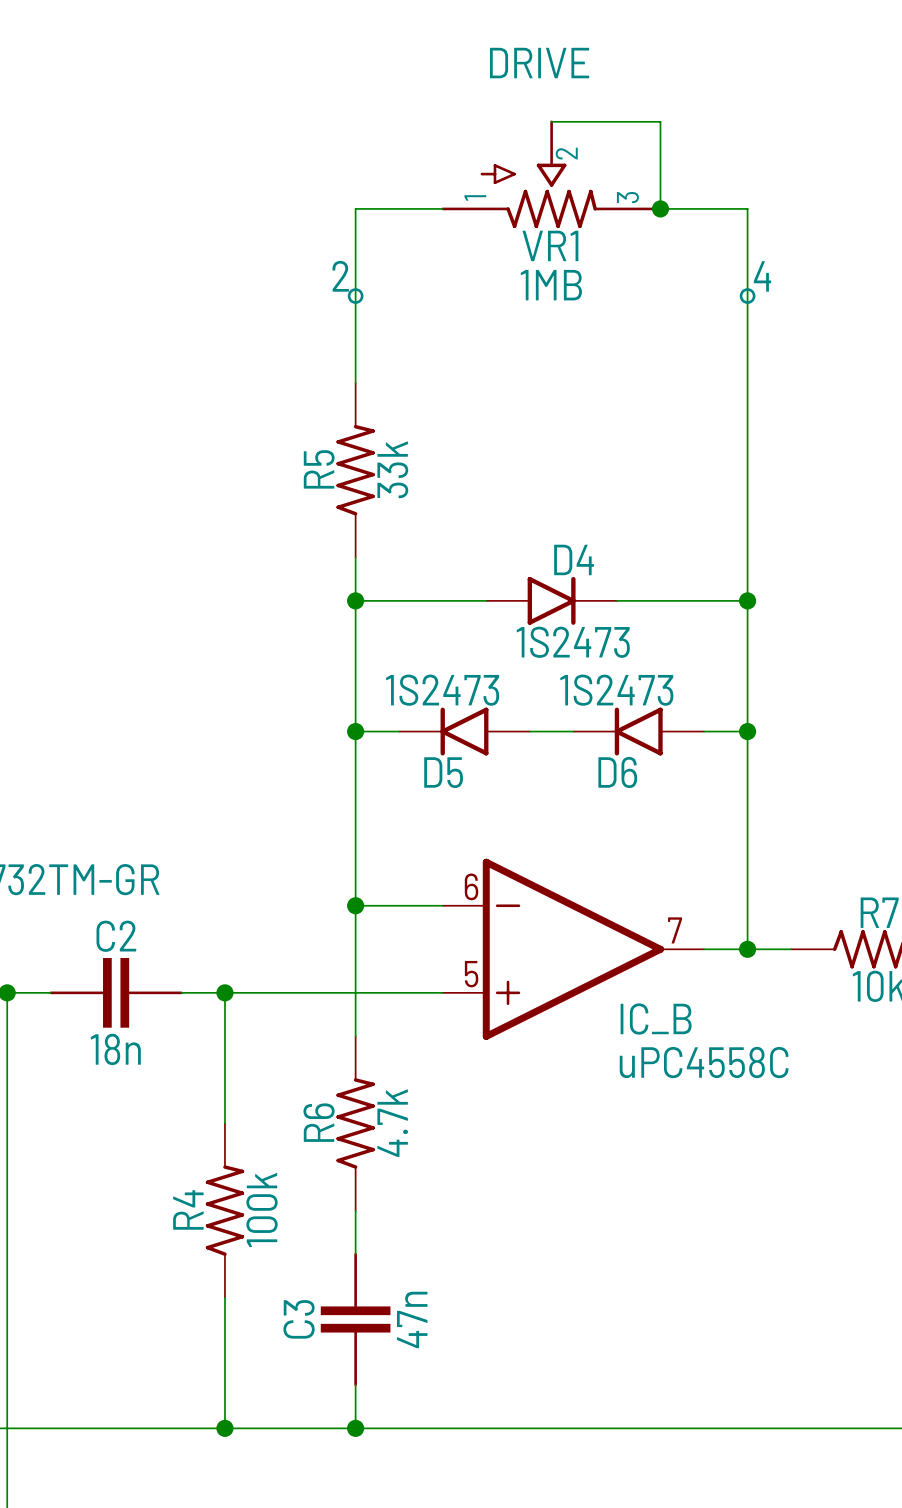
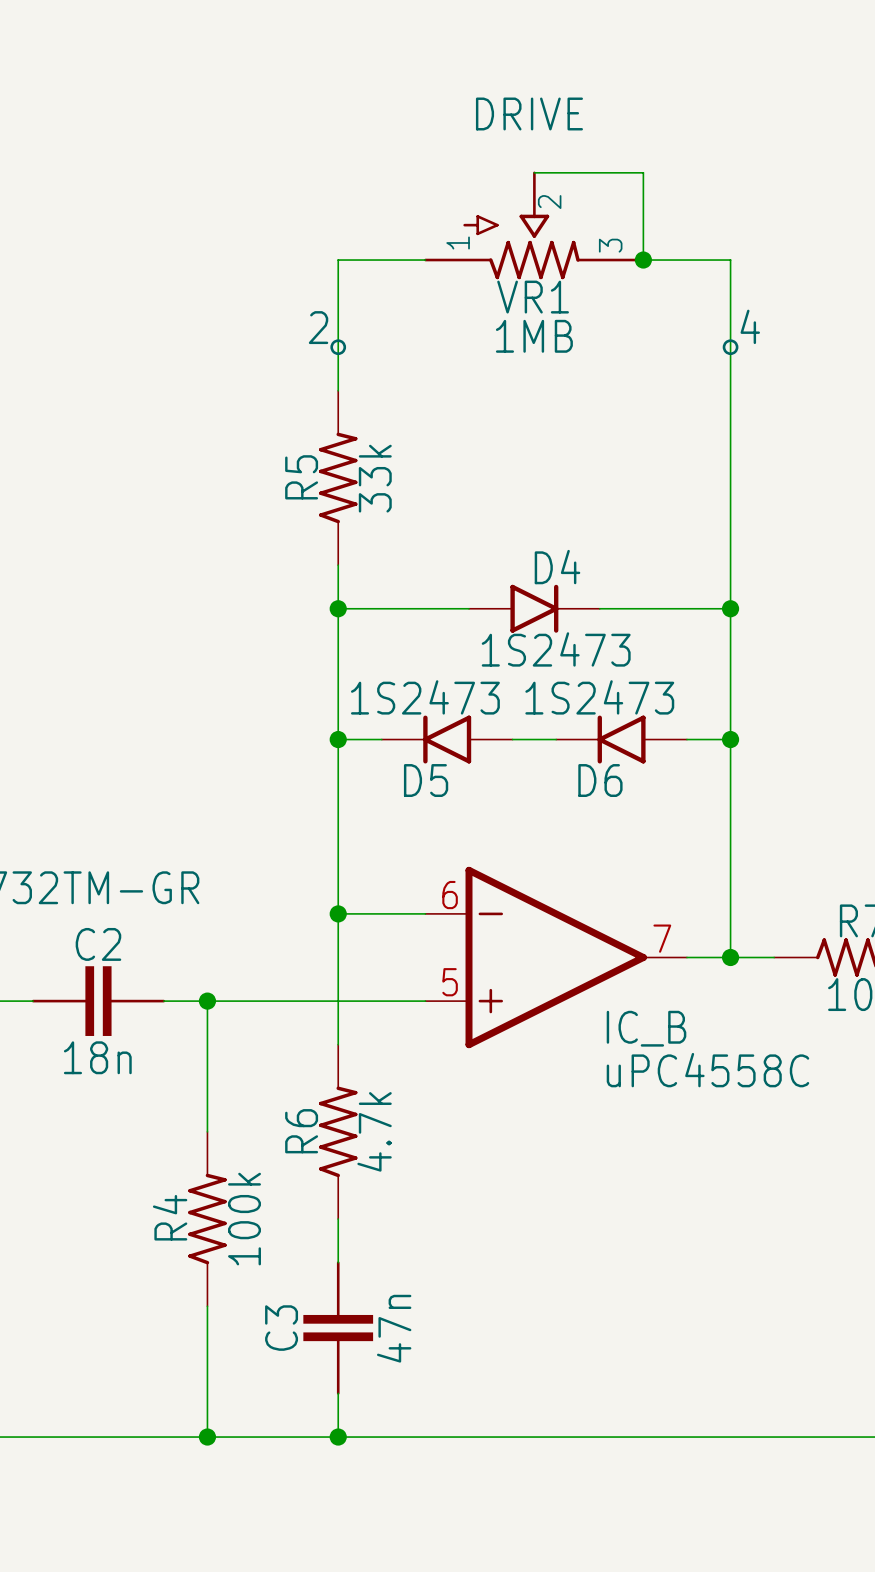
text position: DRIVE (539, 63) -> DRIVE (529, 113)
wire: (551, 121) (660, 121) (660, 165) -> (534, 172) (643, 172)
VR1 position: (551, 174) -> (534, 225)
wire: (442, 208) (355, 208) (355, 252) -> (425, 260) (338, 260)
wire: (660, 208) (747, 208) (747, 252) -> (643, 216) (643, 260) (730, 260)
junction position: (660, 208) -> (643, 260)
text position: 2 (340, 276) -> 2 (318, 327)
text position: 4 (762, 276) -> 4 (750, 326)
drawing position: (355, 296) -> (338, 347)
drawing position: (747, 296) -> (730, 347)

